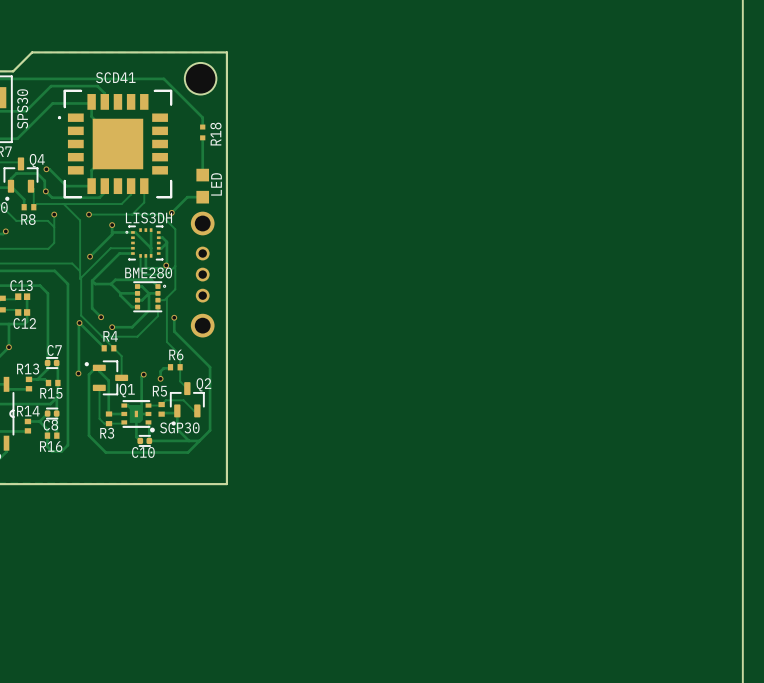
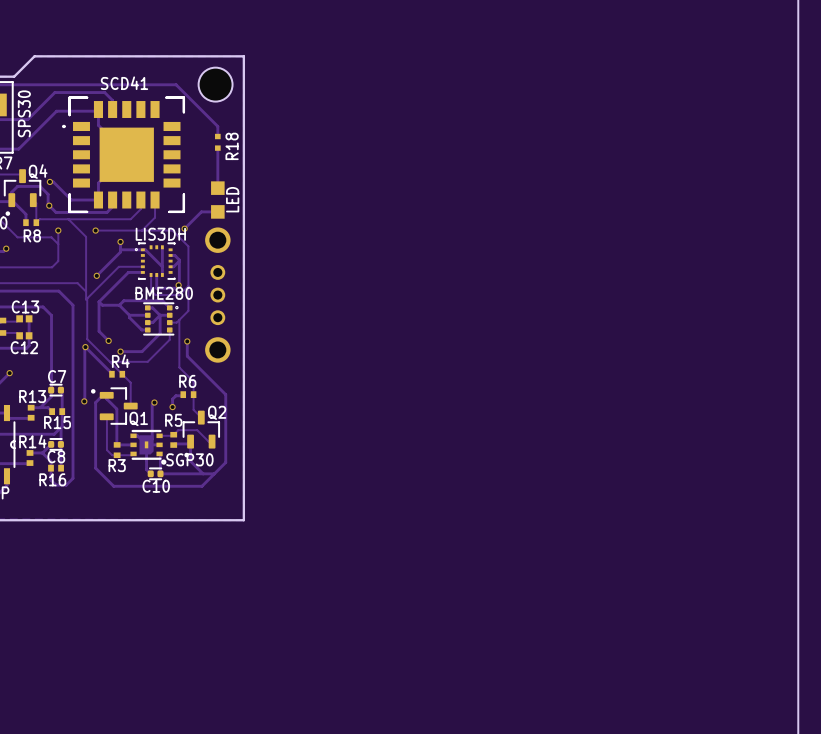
track: (8, 324) (8, 347) -> none

